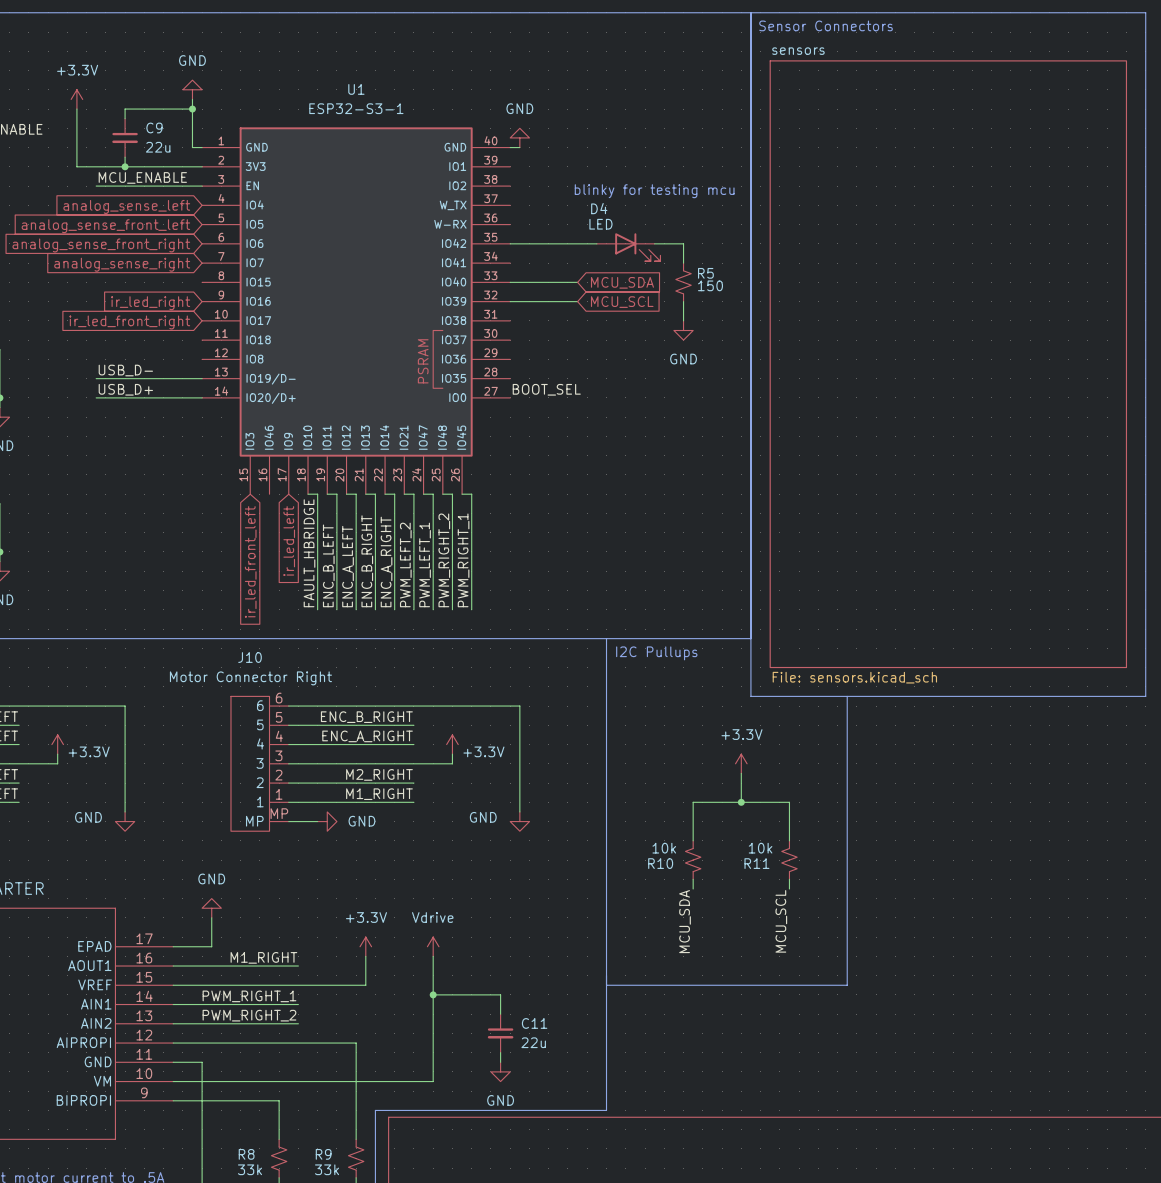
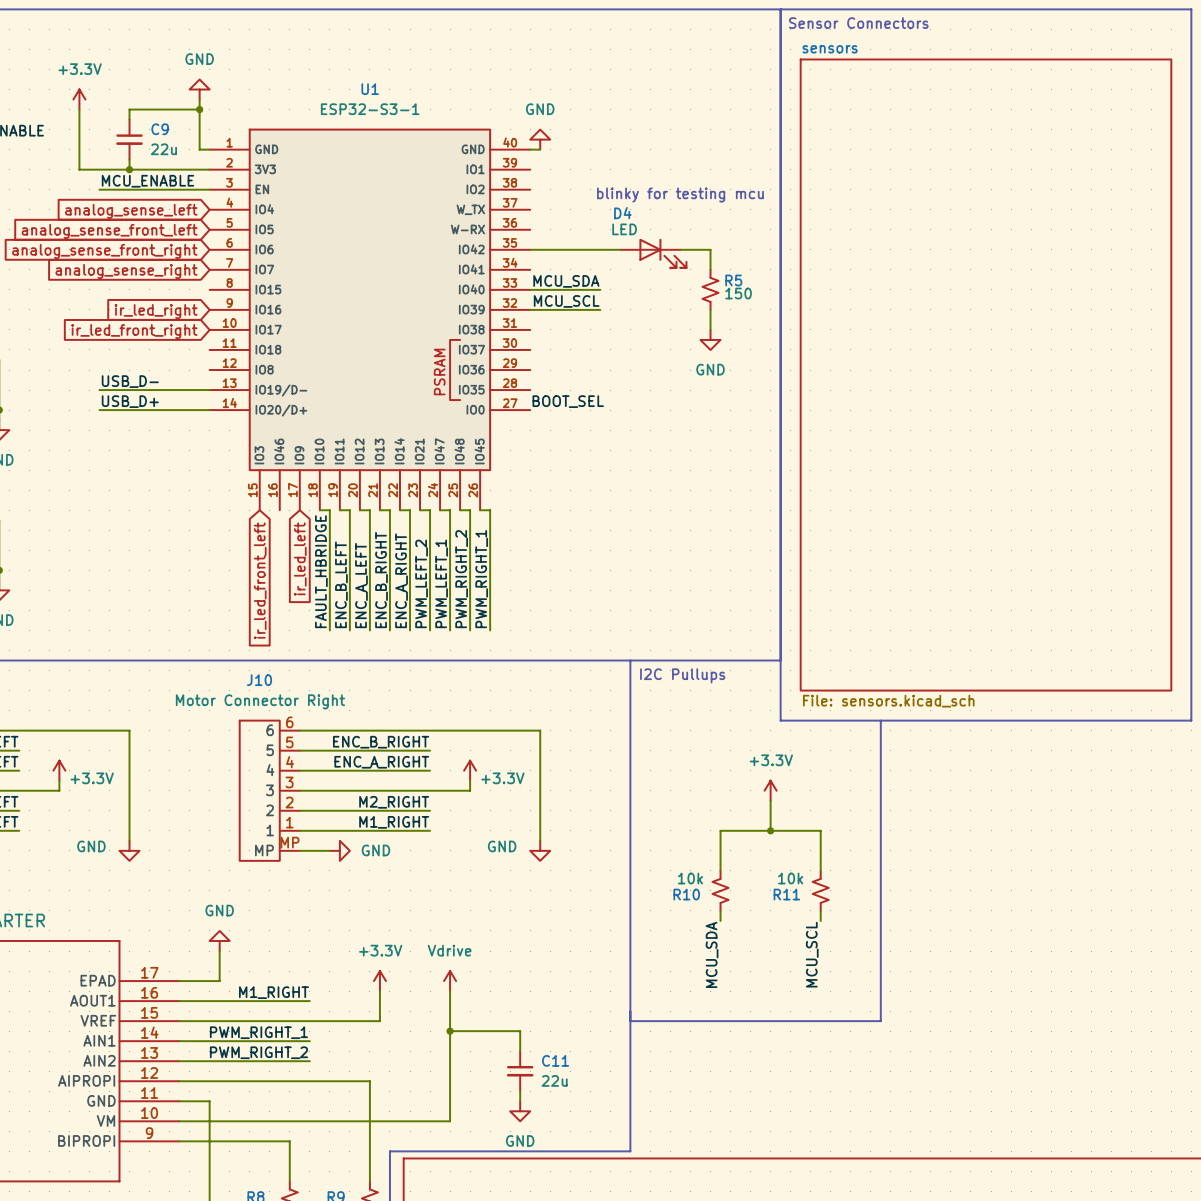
label: none -> MCU_SDA (566, 281)
global label: MCU_SDA (622, 282) -> none
label: none -> MCU_SCL (566, 301)
global label: MCU_SCL (622, 302) -> none

